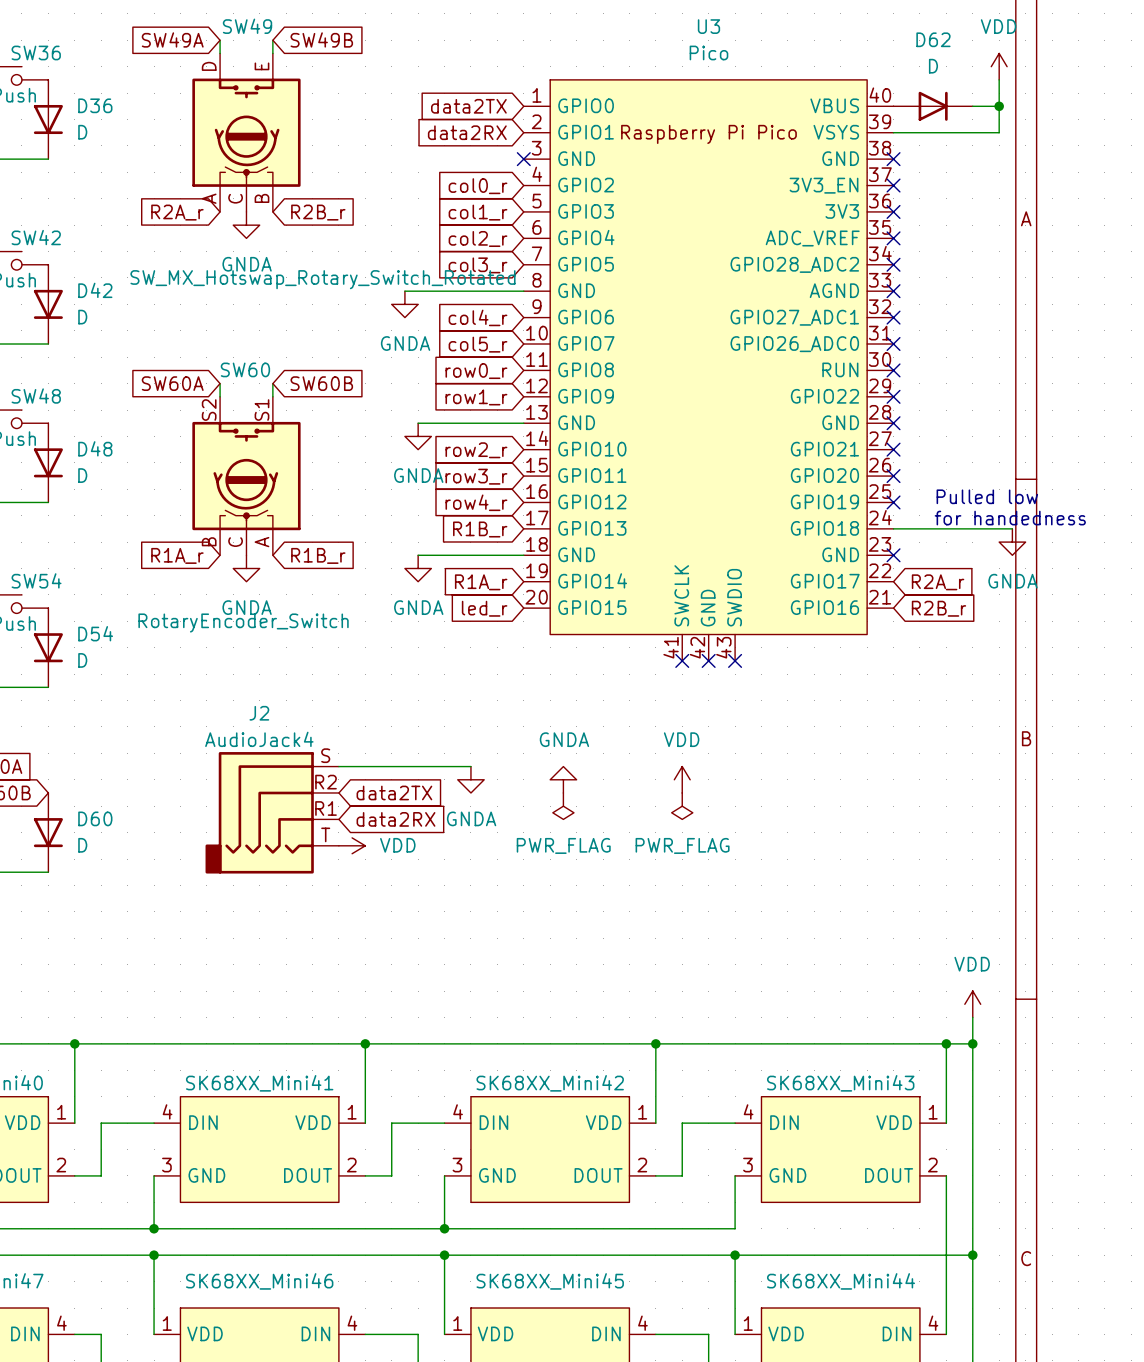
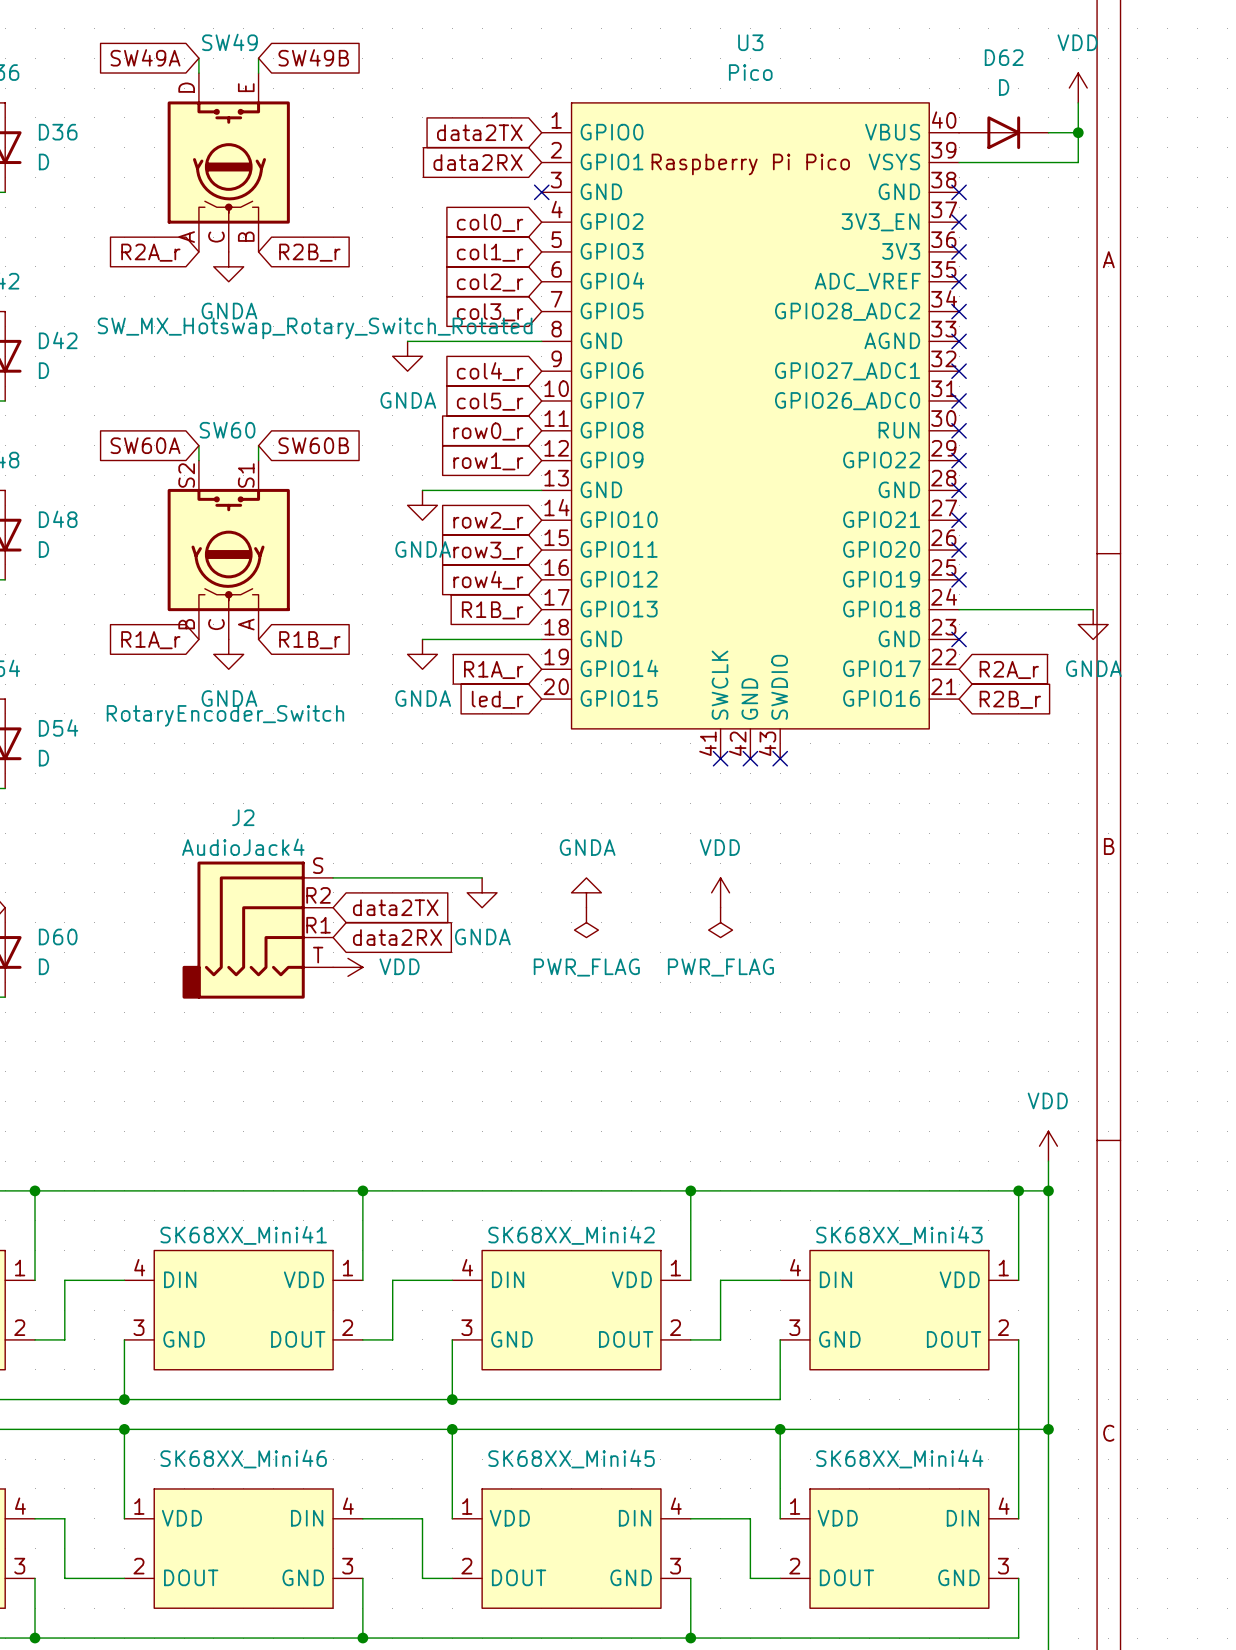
text: Pulled low (987, 496) -> none
text: for handedness (1010, 518) -> none

